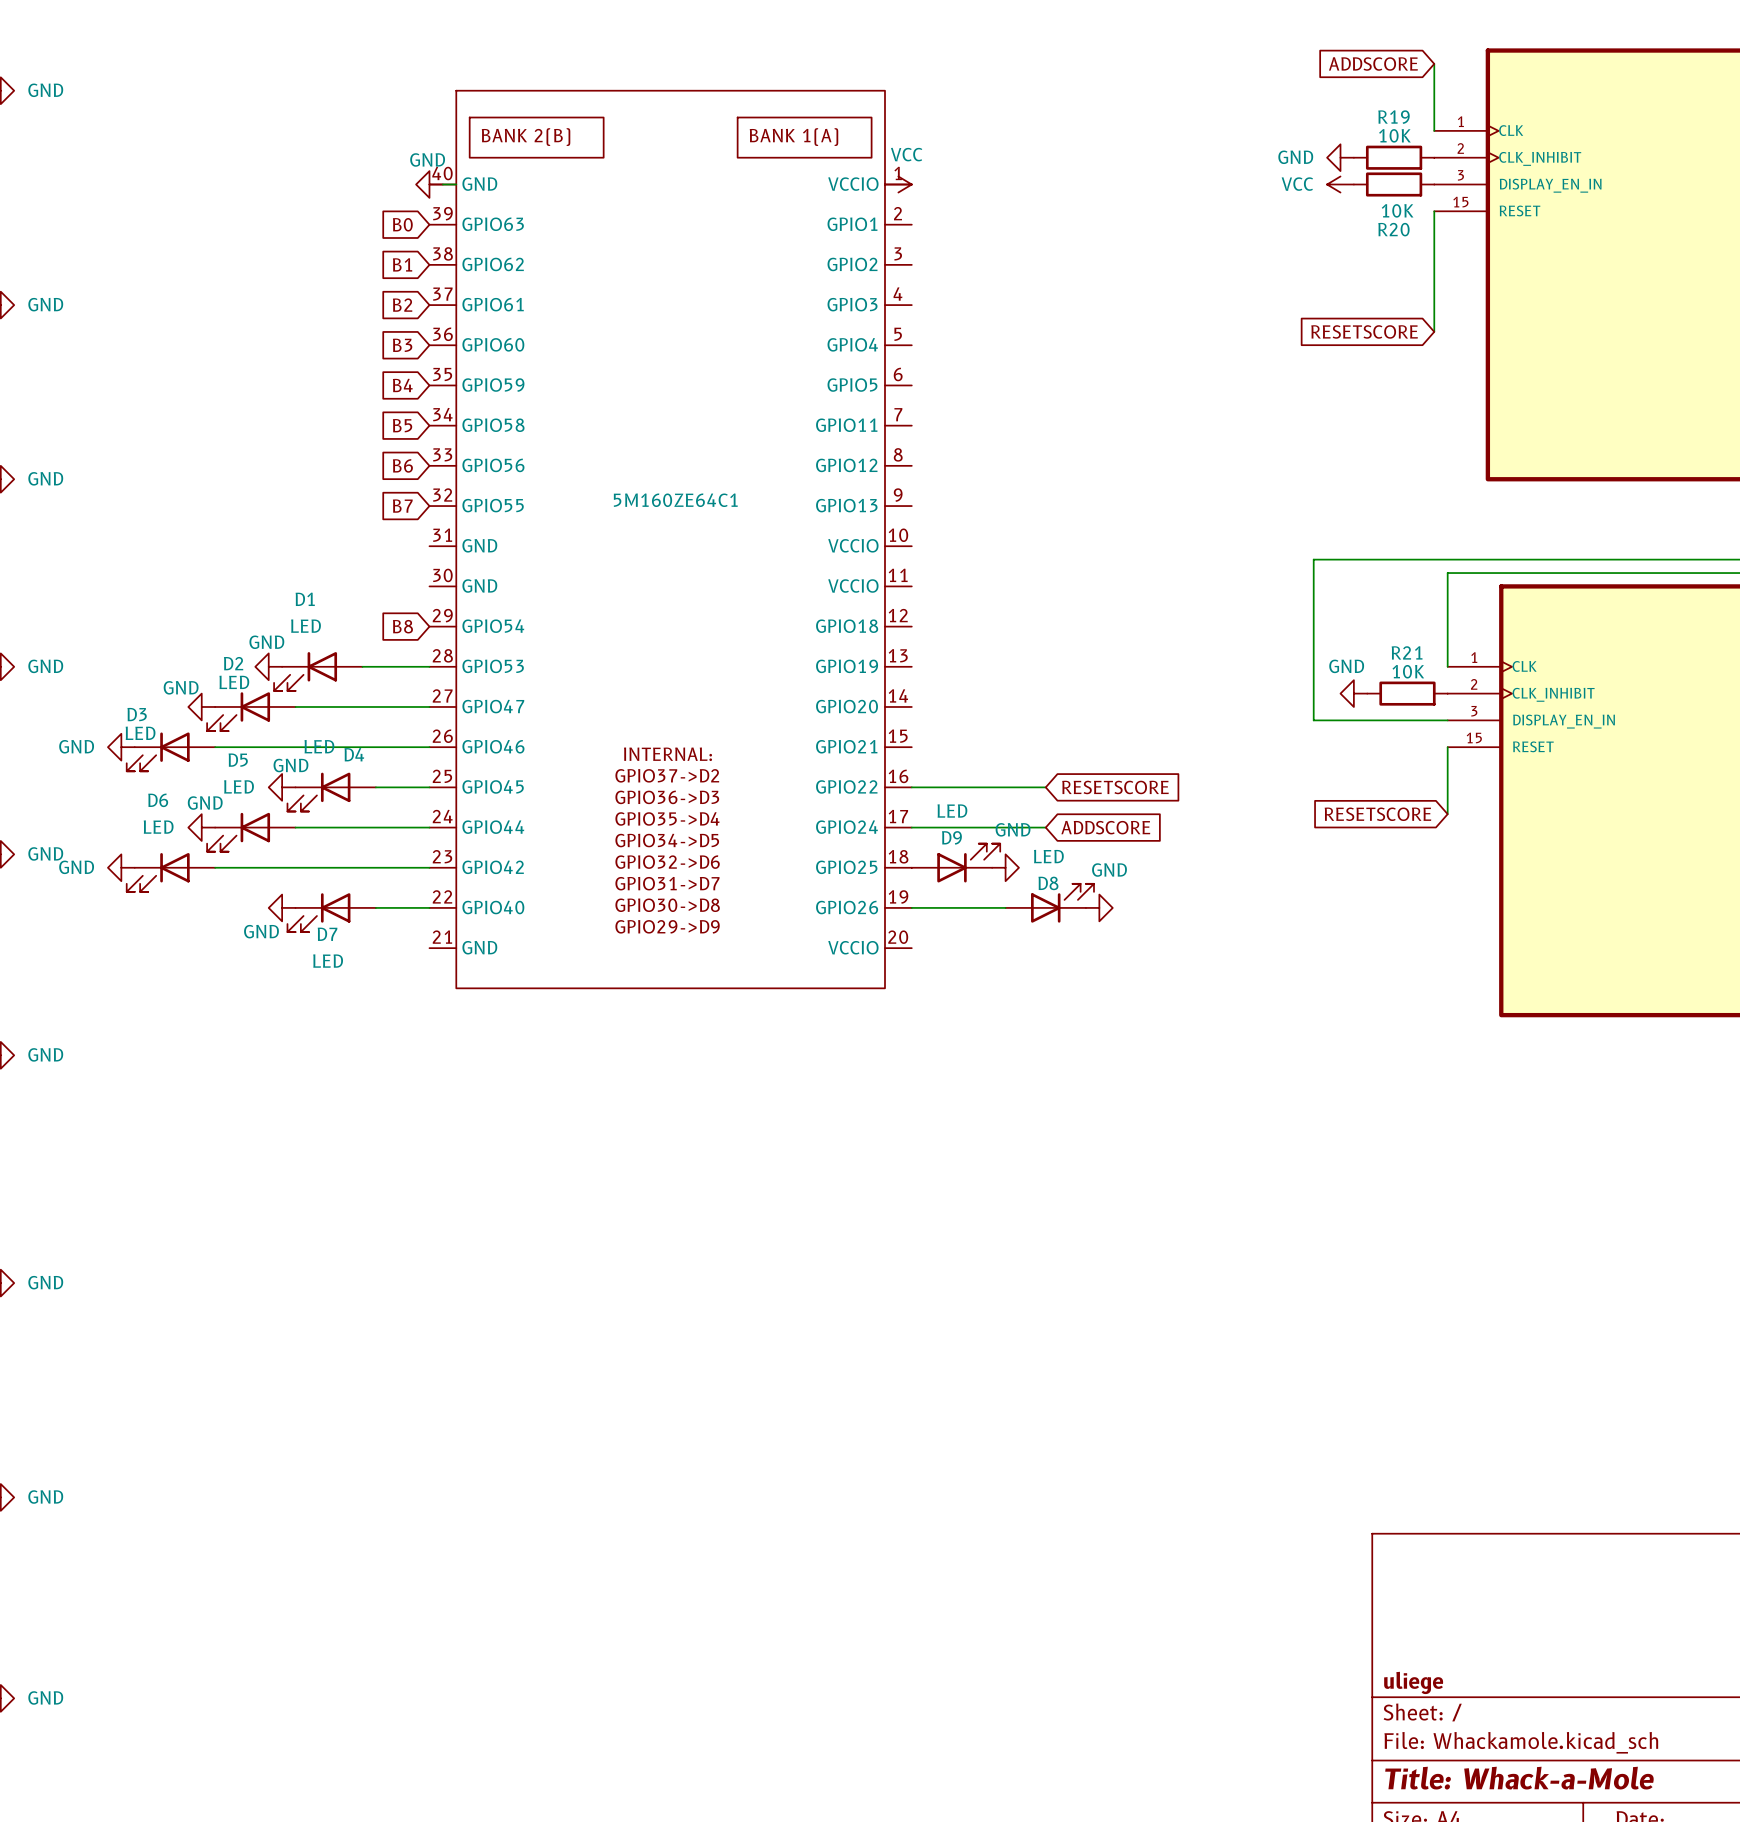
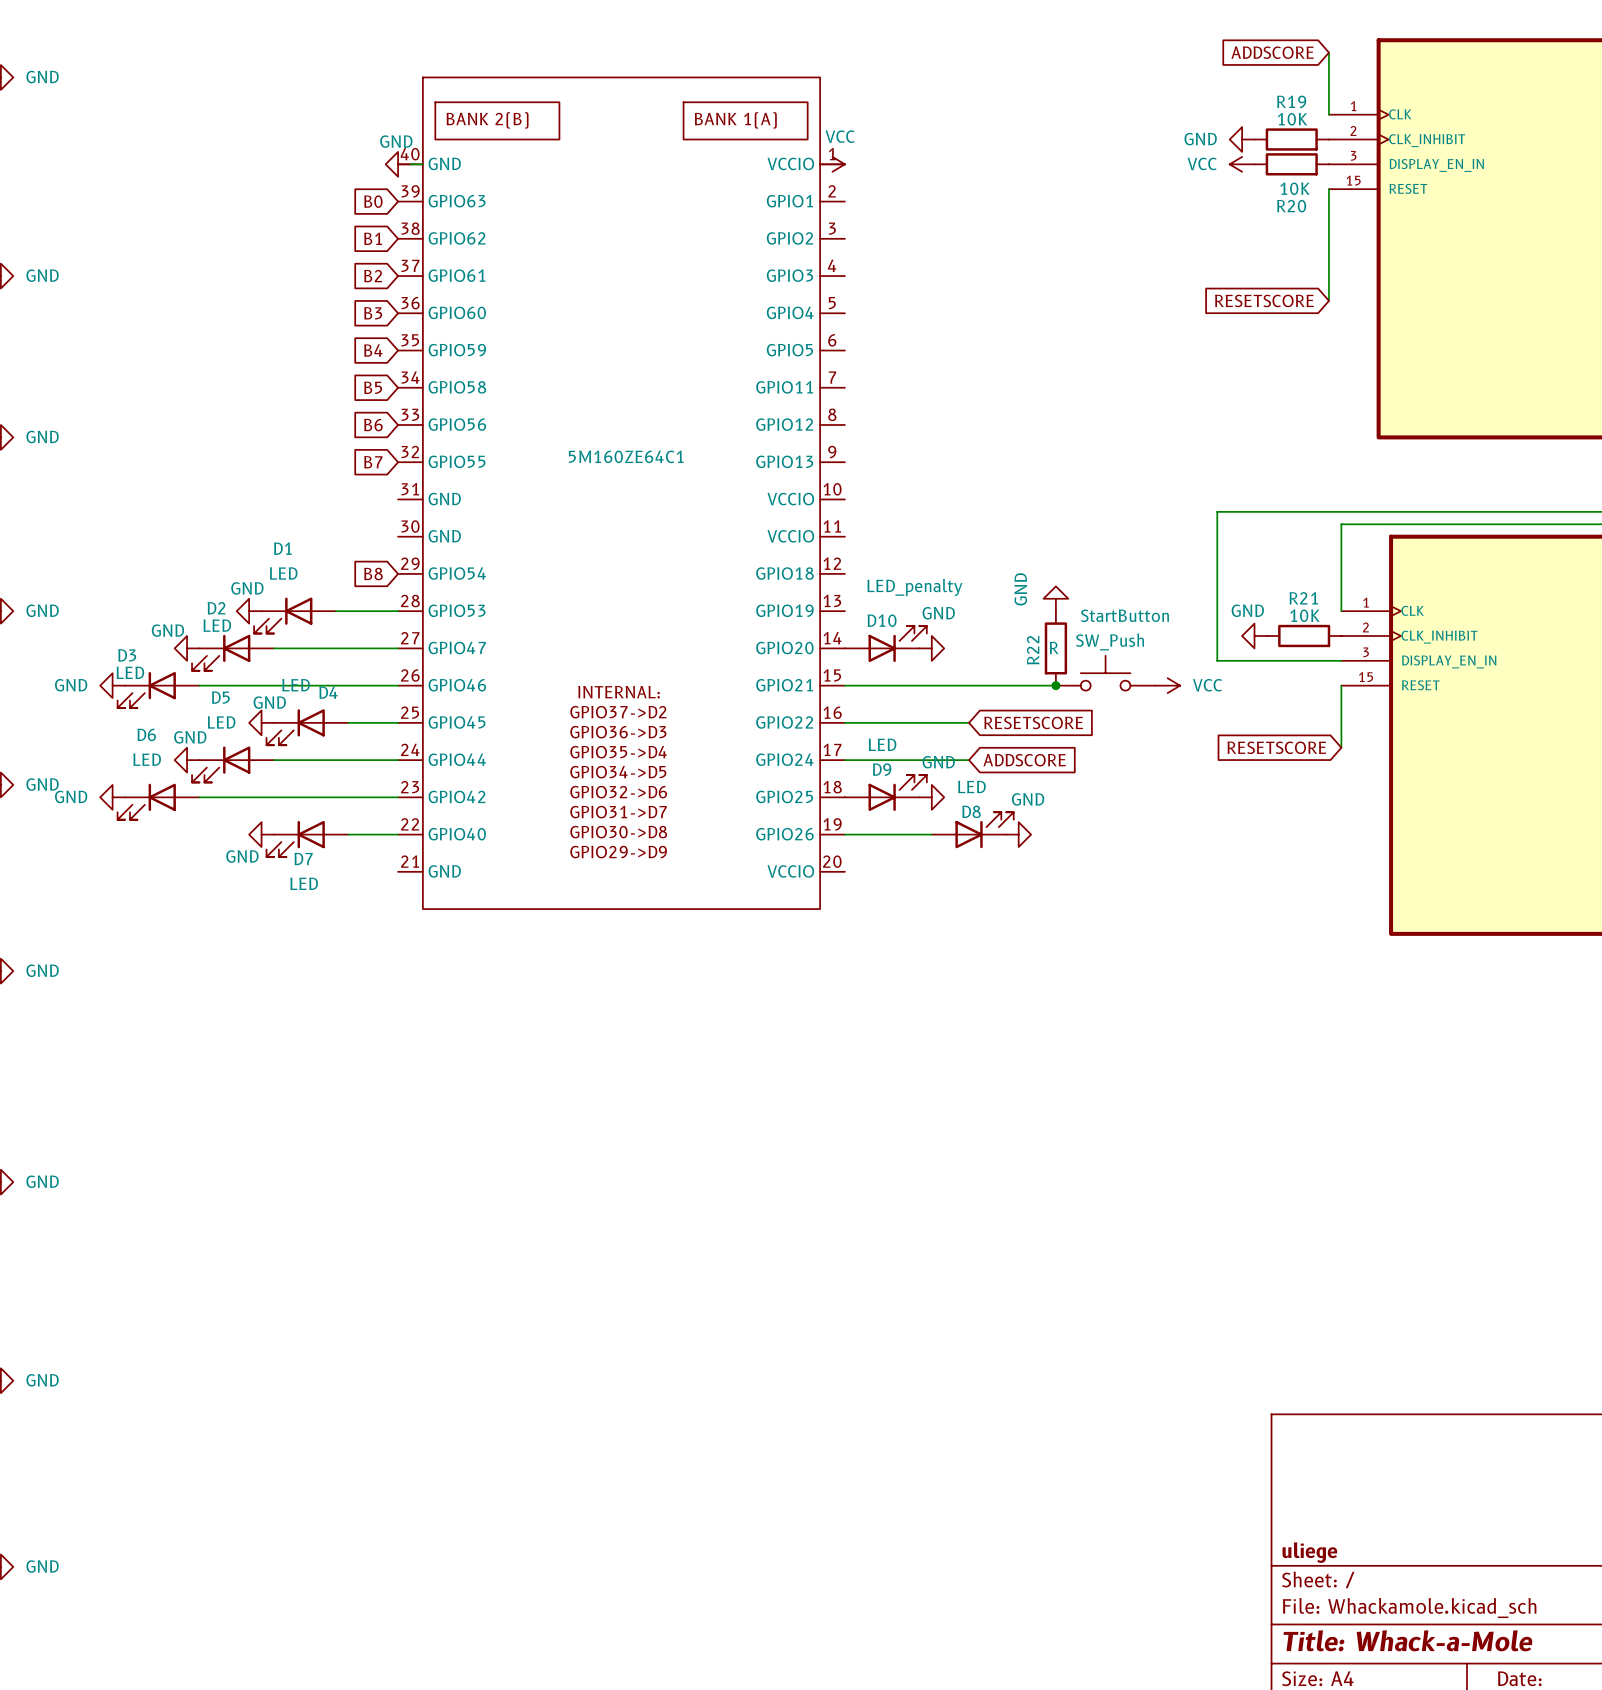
power symbol: none -> GND (1055, 598)
D10: none -> LED_penalty (885, 644)
power symbol: none -> GND (931, 648)
R22: none -> R (1055, 648)
StartButton: none -> SW_Push (1105, 673)
wire: none -> (844, 685) (1055, 685)
junction: none -> (1055, 685)
power symbol: none -> VCC (1167, 685)

